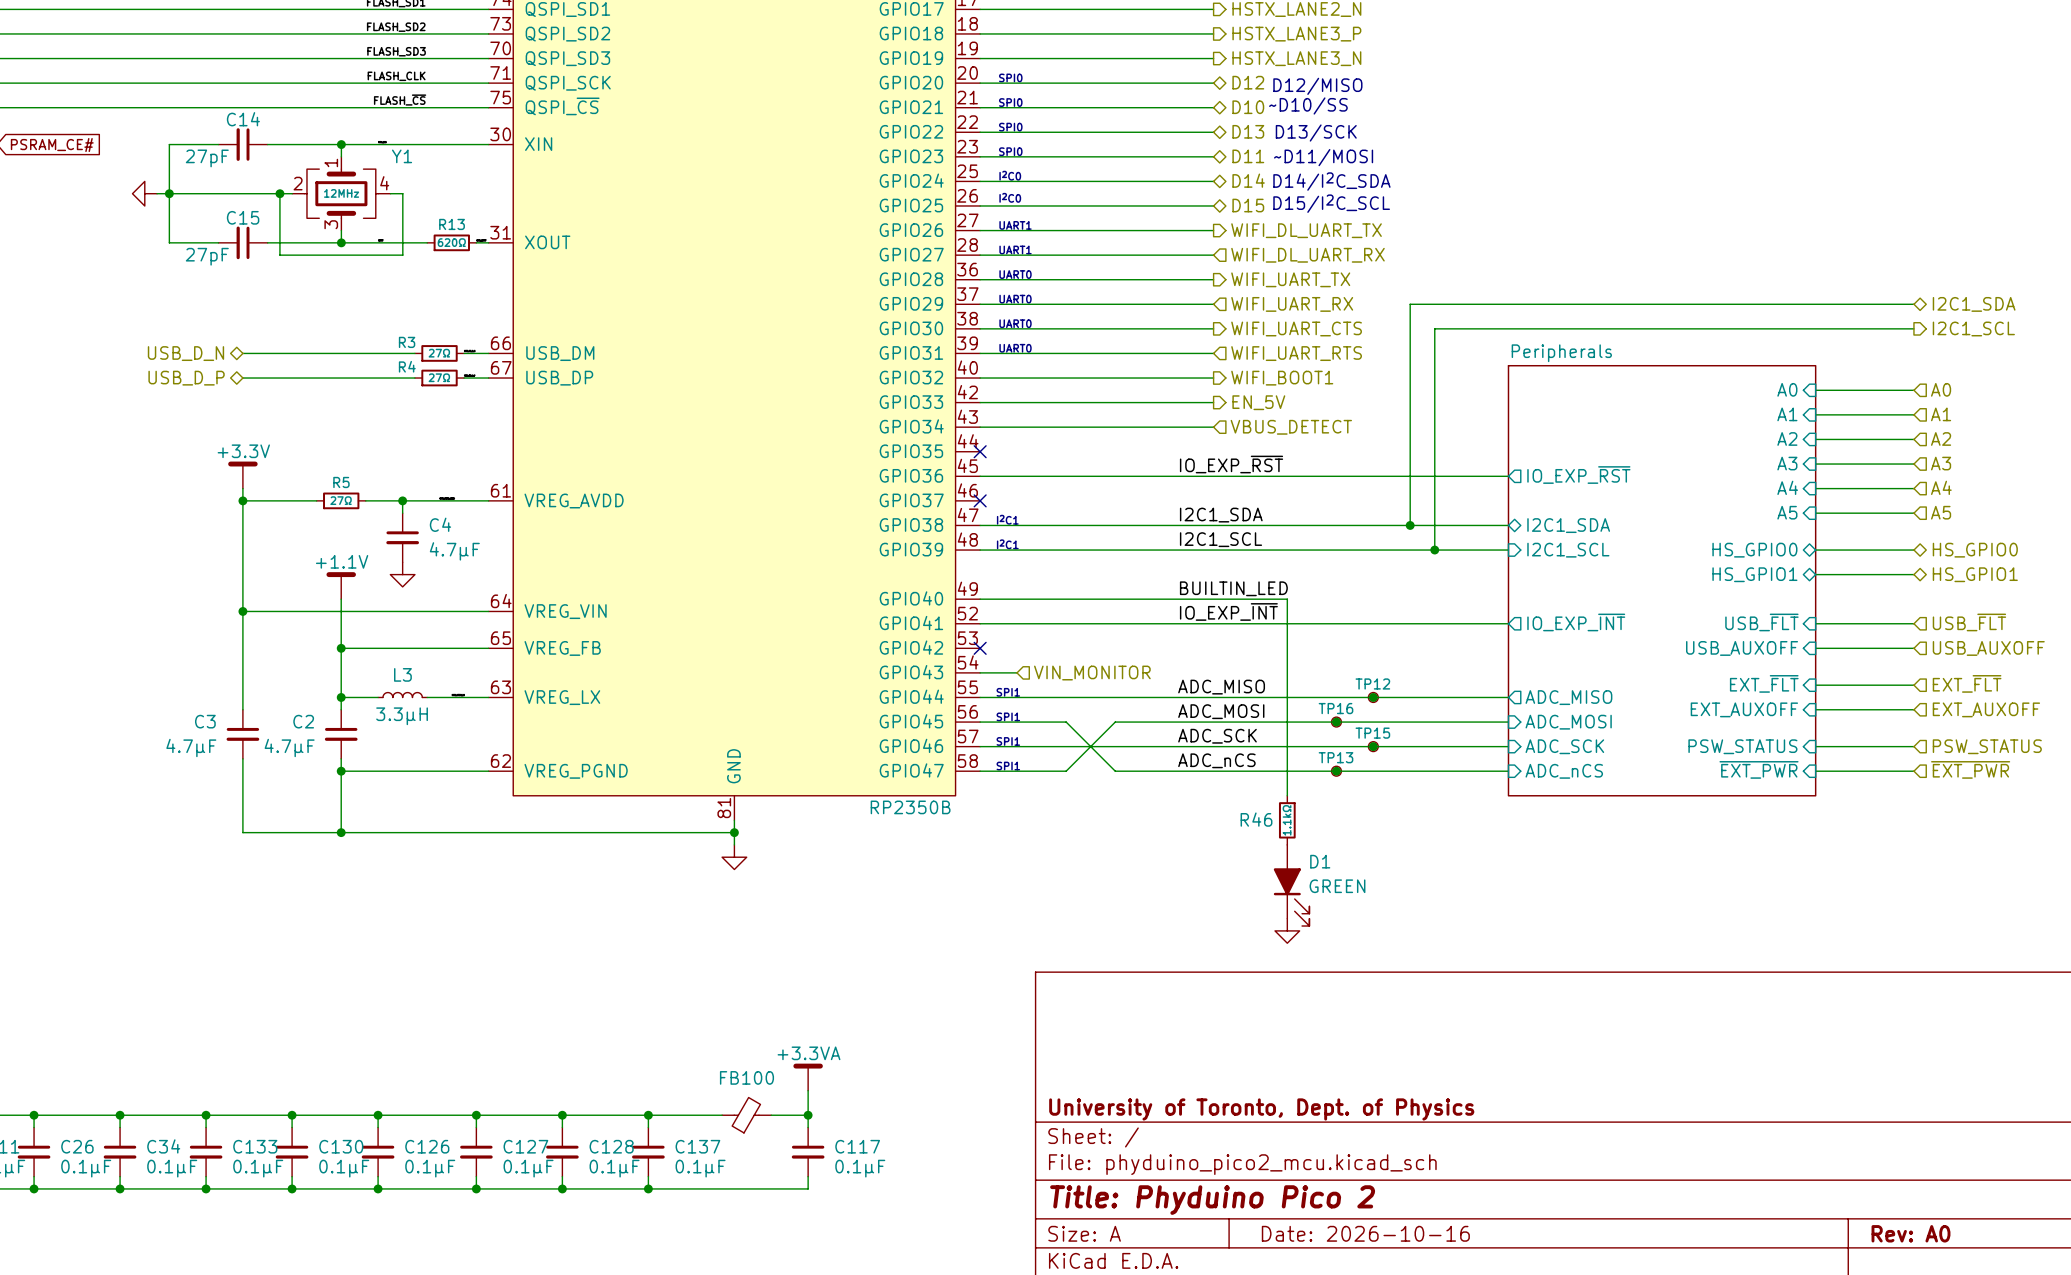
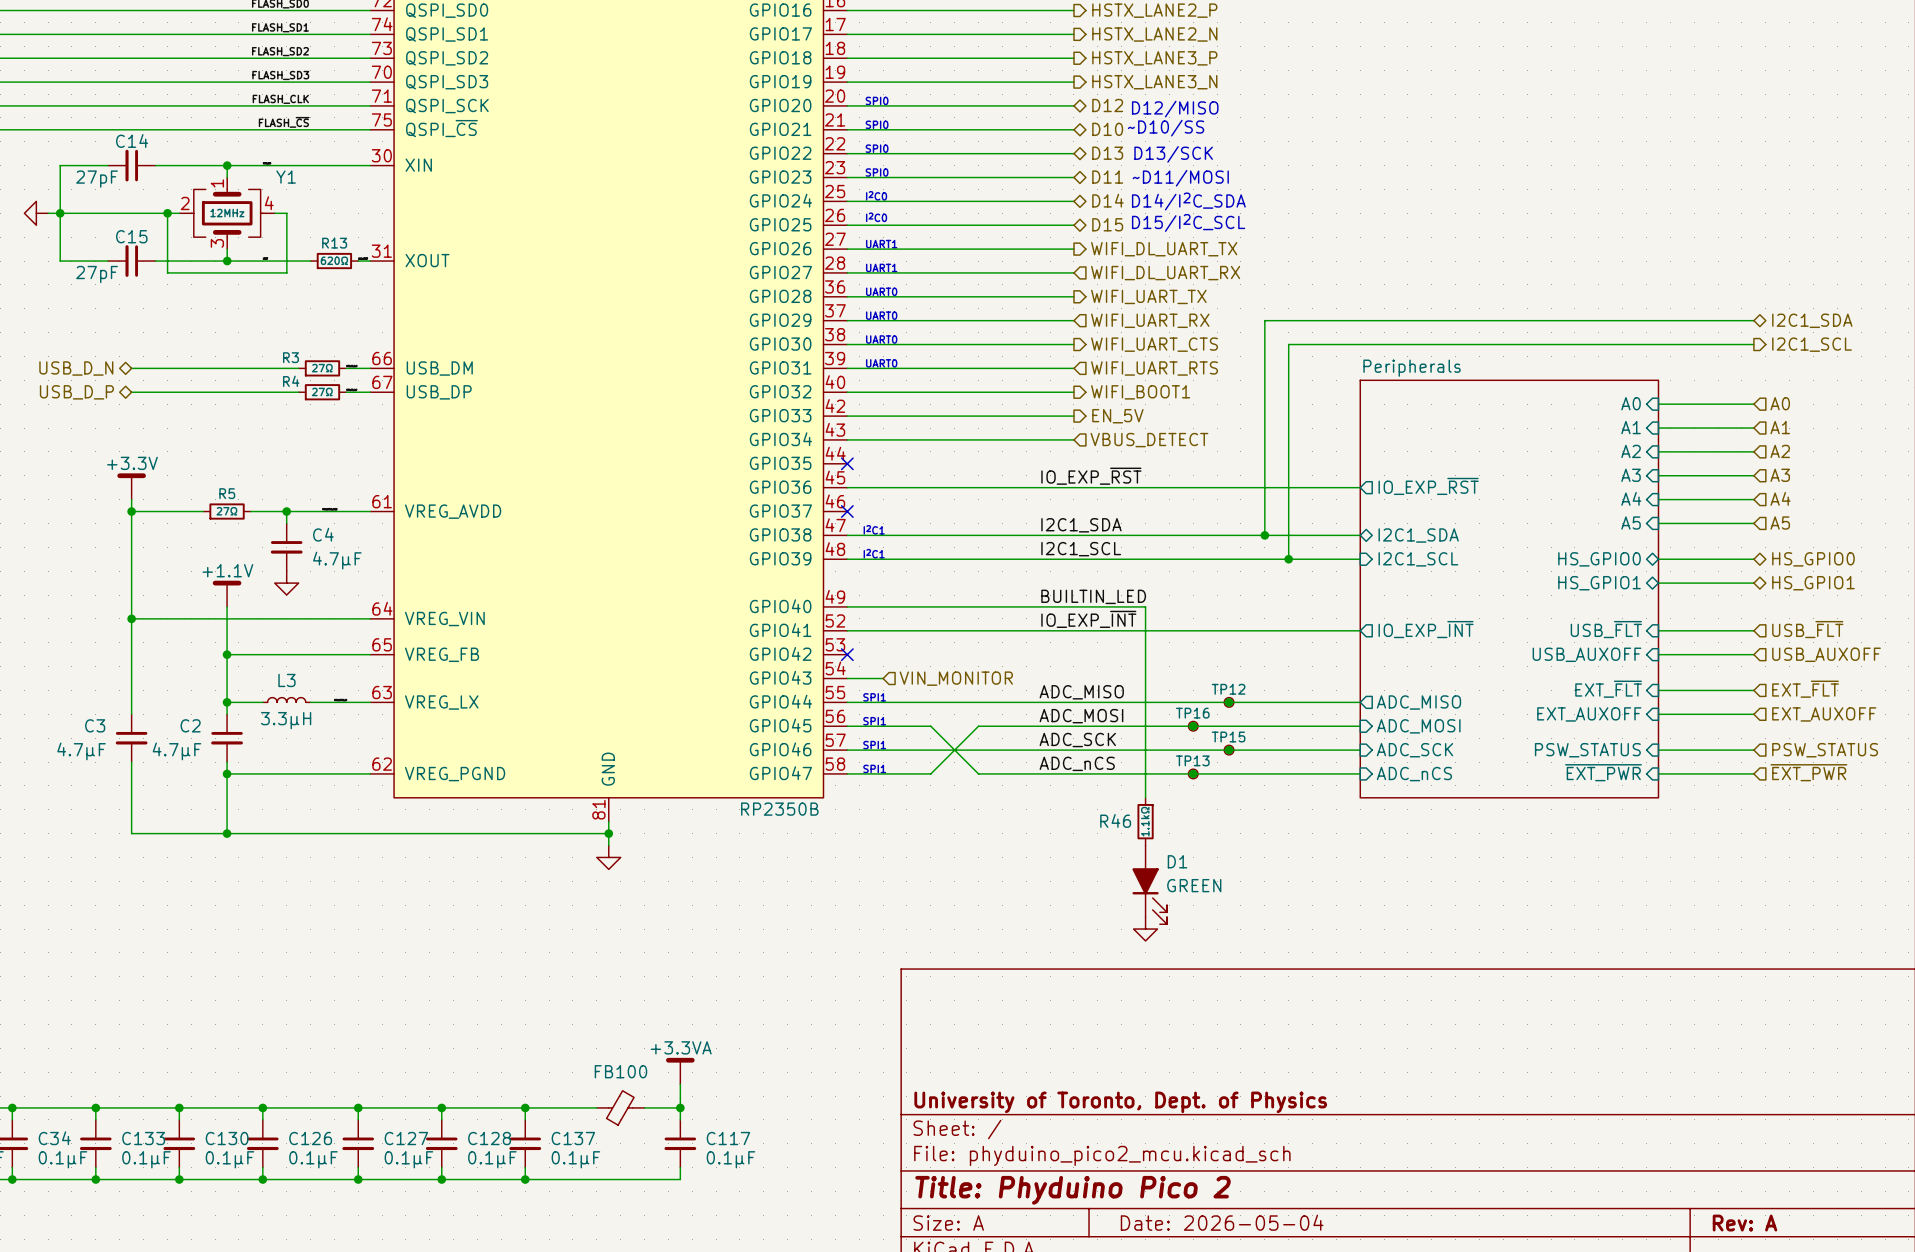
title block: Date: 2026-10-16 (1365, 1233) -> Date: 2026-05-04 (1222, 1222)
title block: Rev: A0 (1910, 1233) -> Rev: A (1744, 1223)

